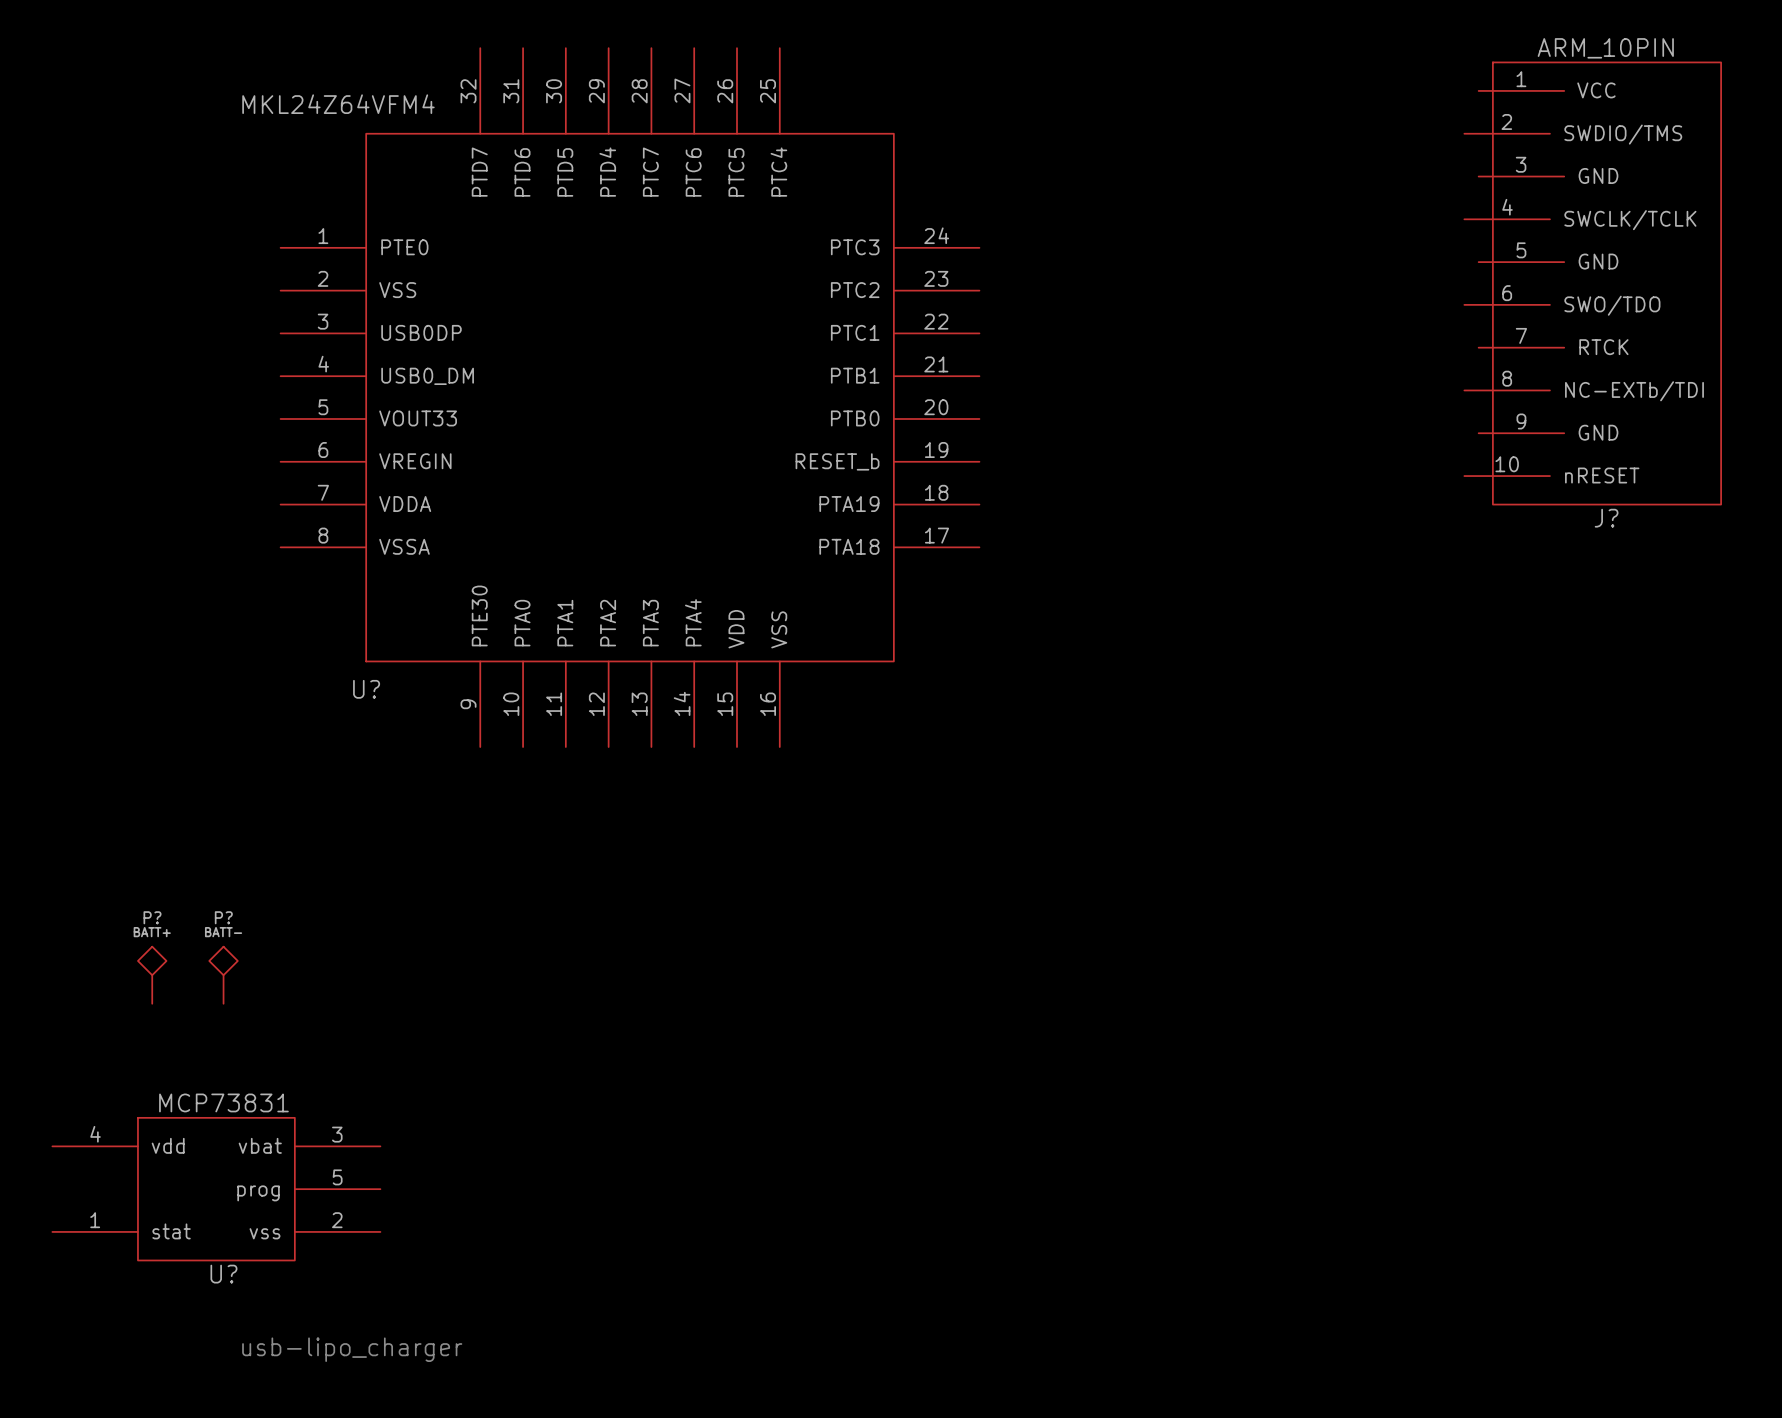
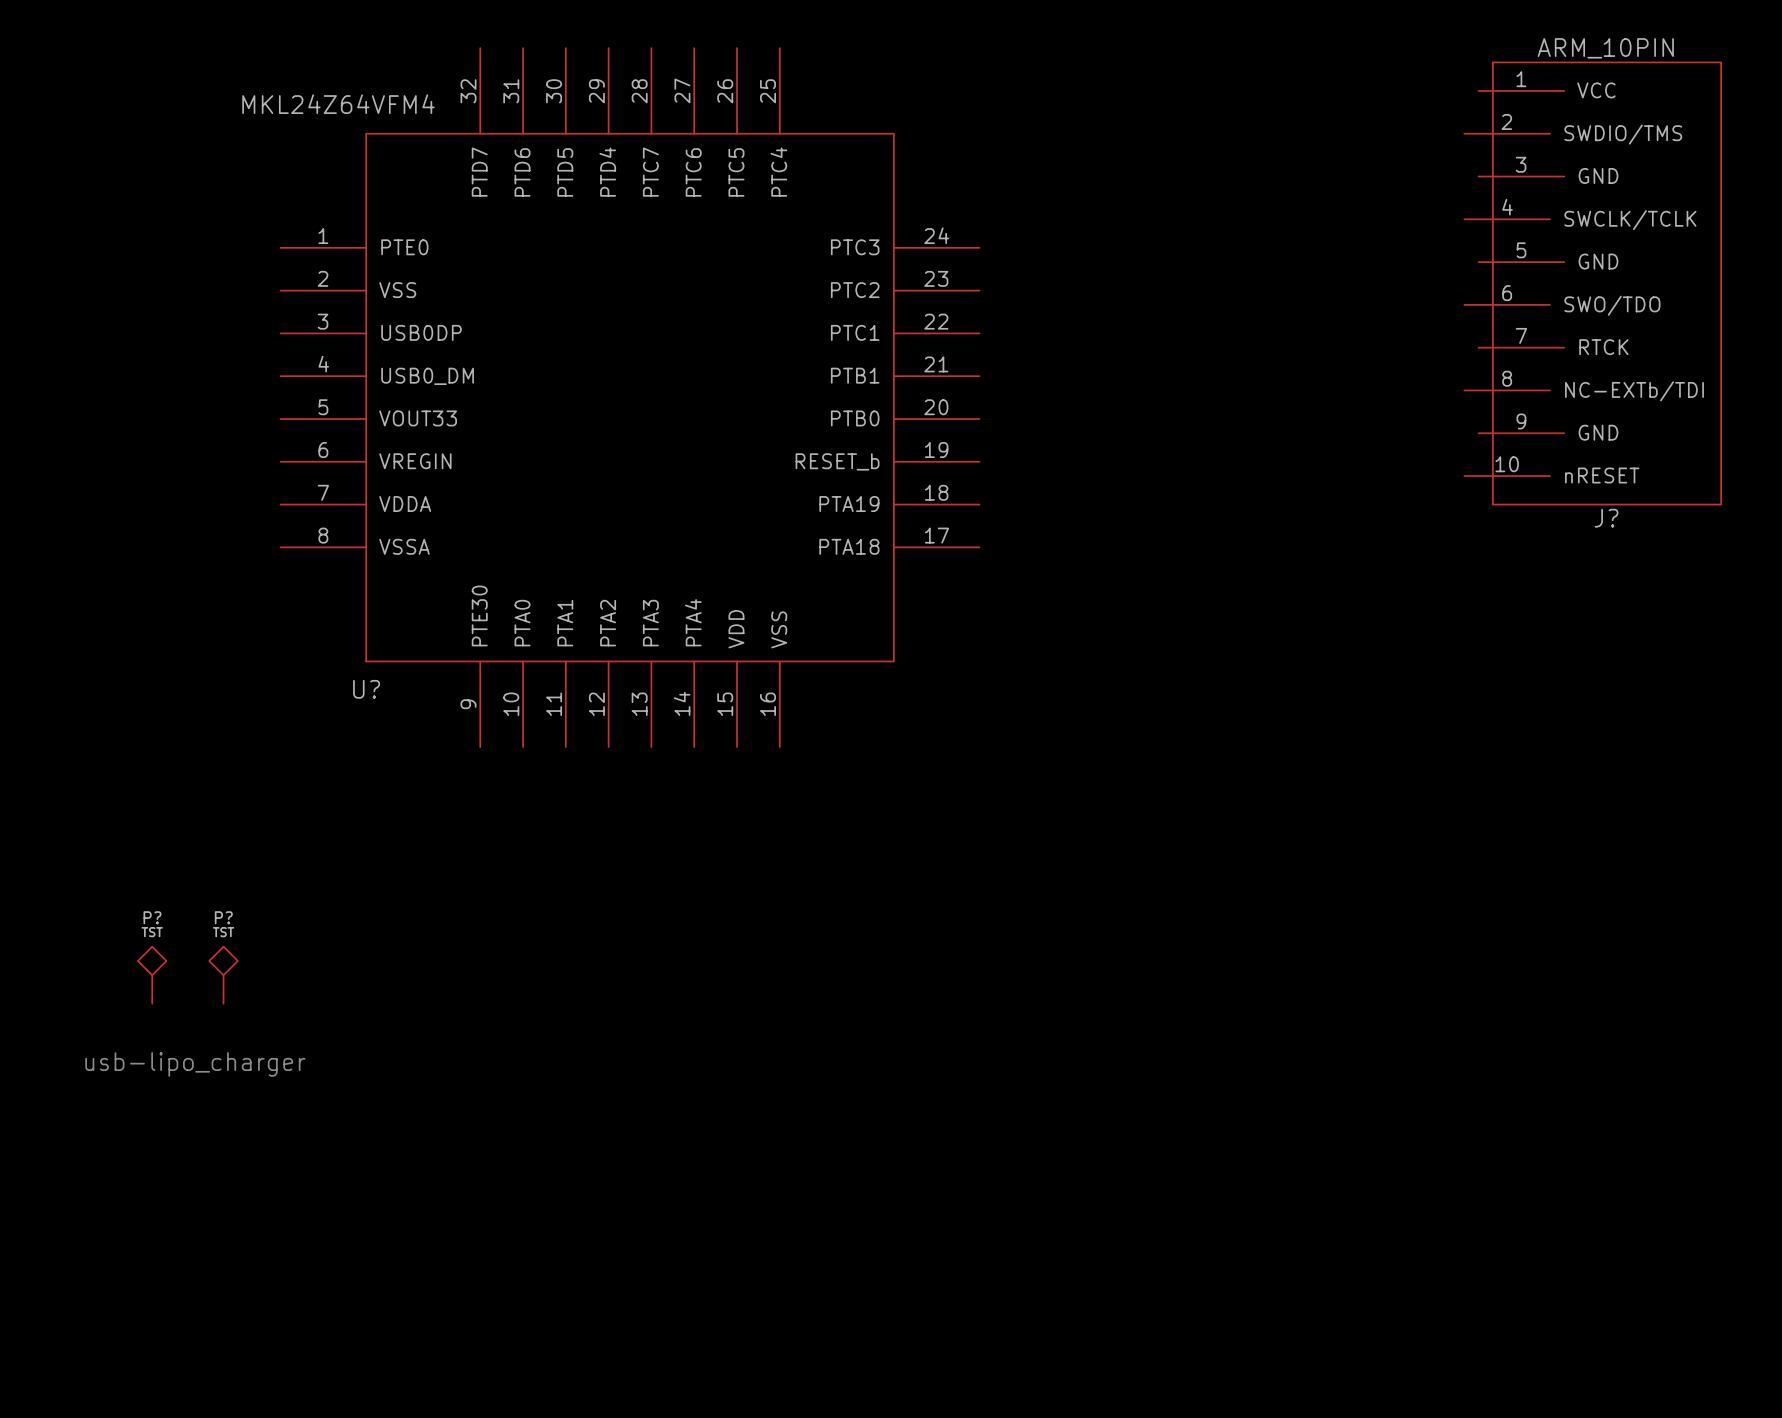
P? value: BATT+ (152, 932) -> TST (152, 932)
P? value: BATT- (223, 932) -> TST (223, 932)
text: none -> usb-lipo_charger (195, 1064)
U?: MCP73831 (216, 1189) -> none
text: usb-lipo_charger (352, 1349) -> none

